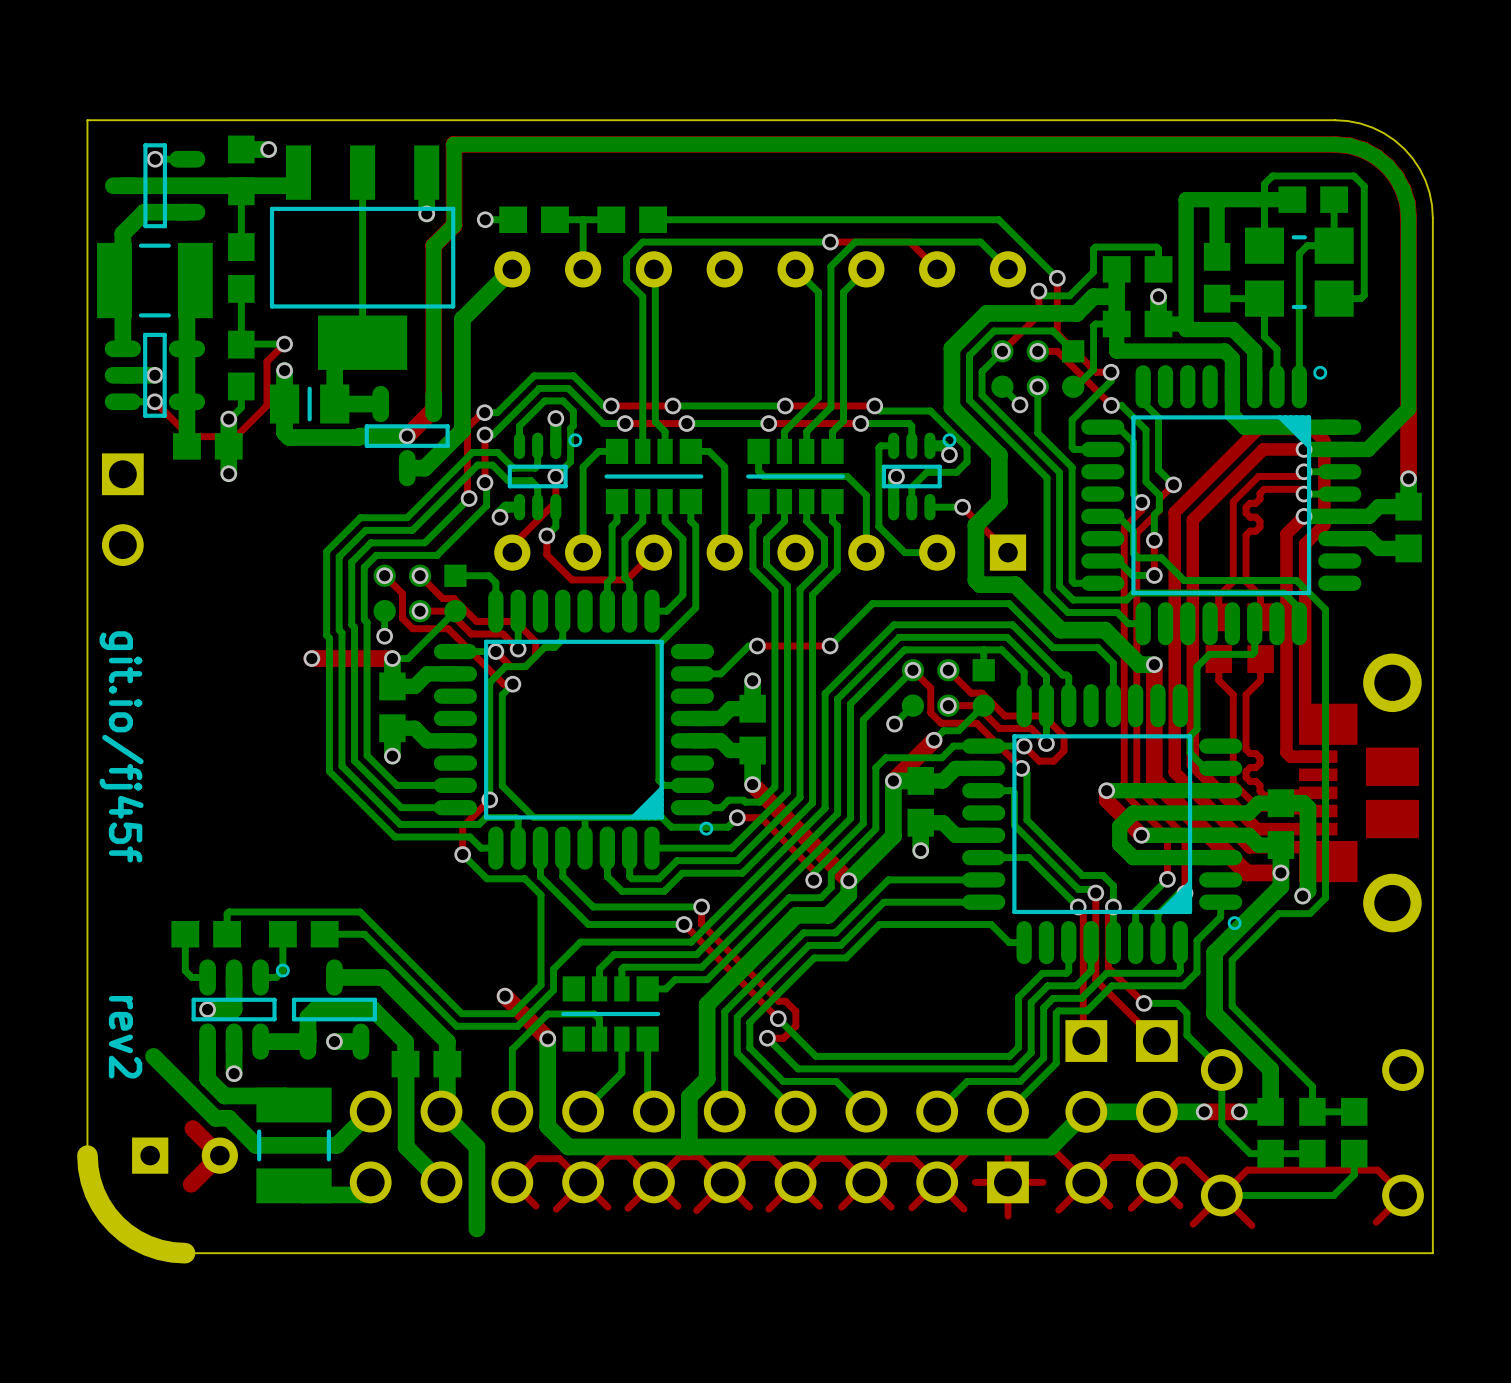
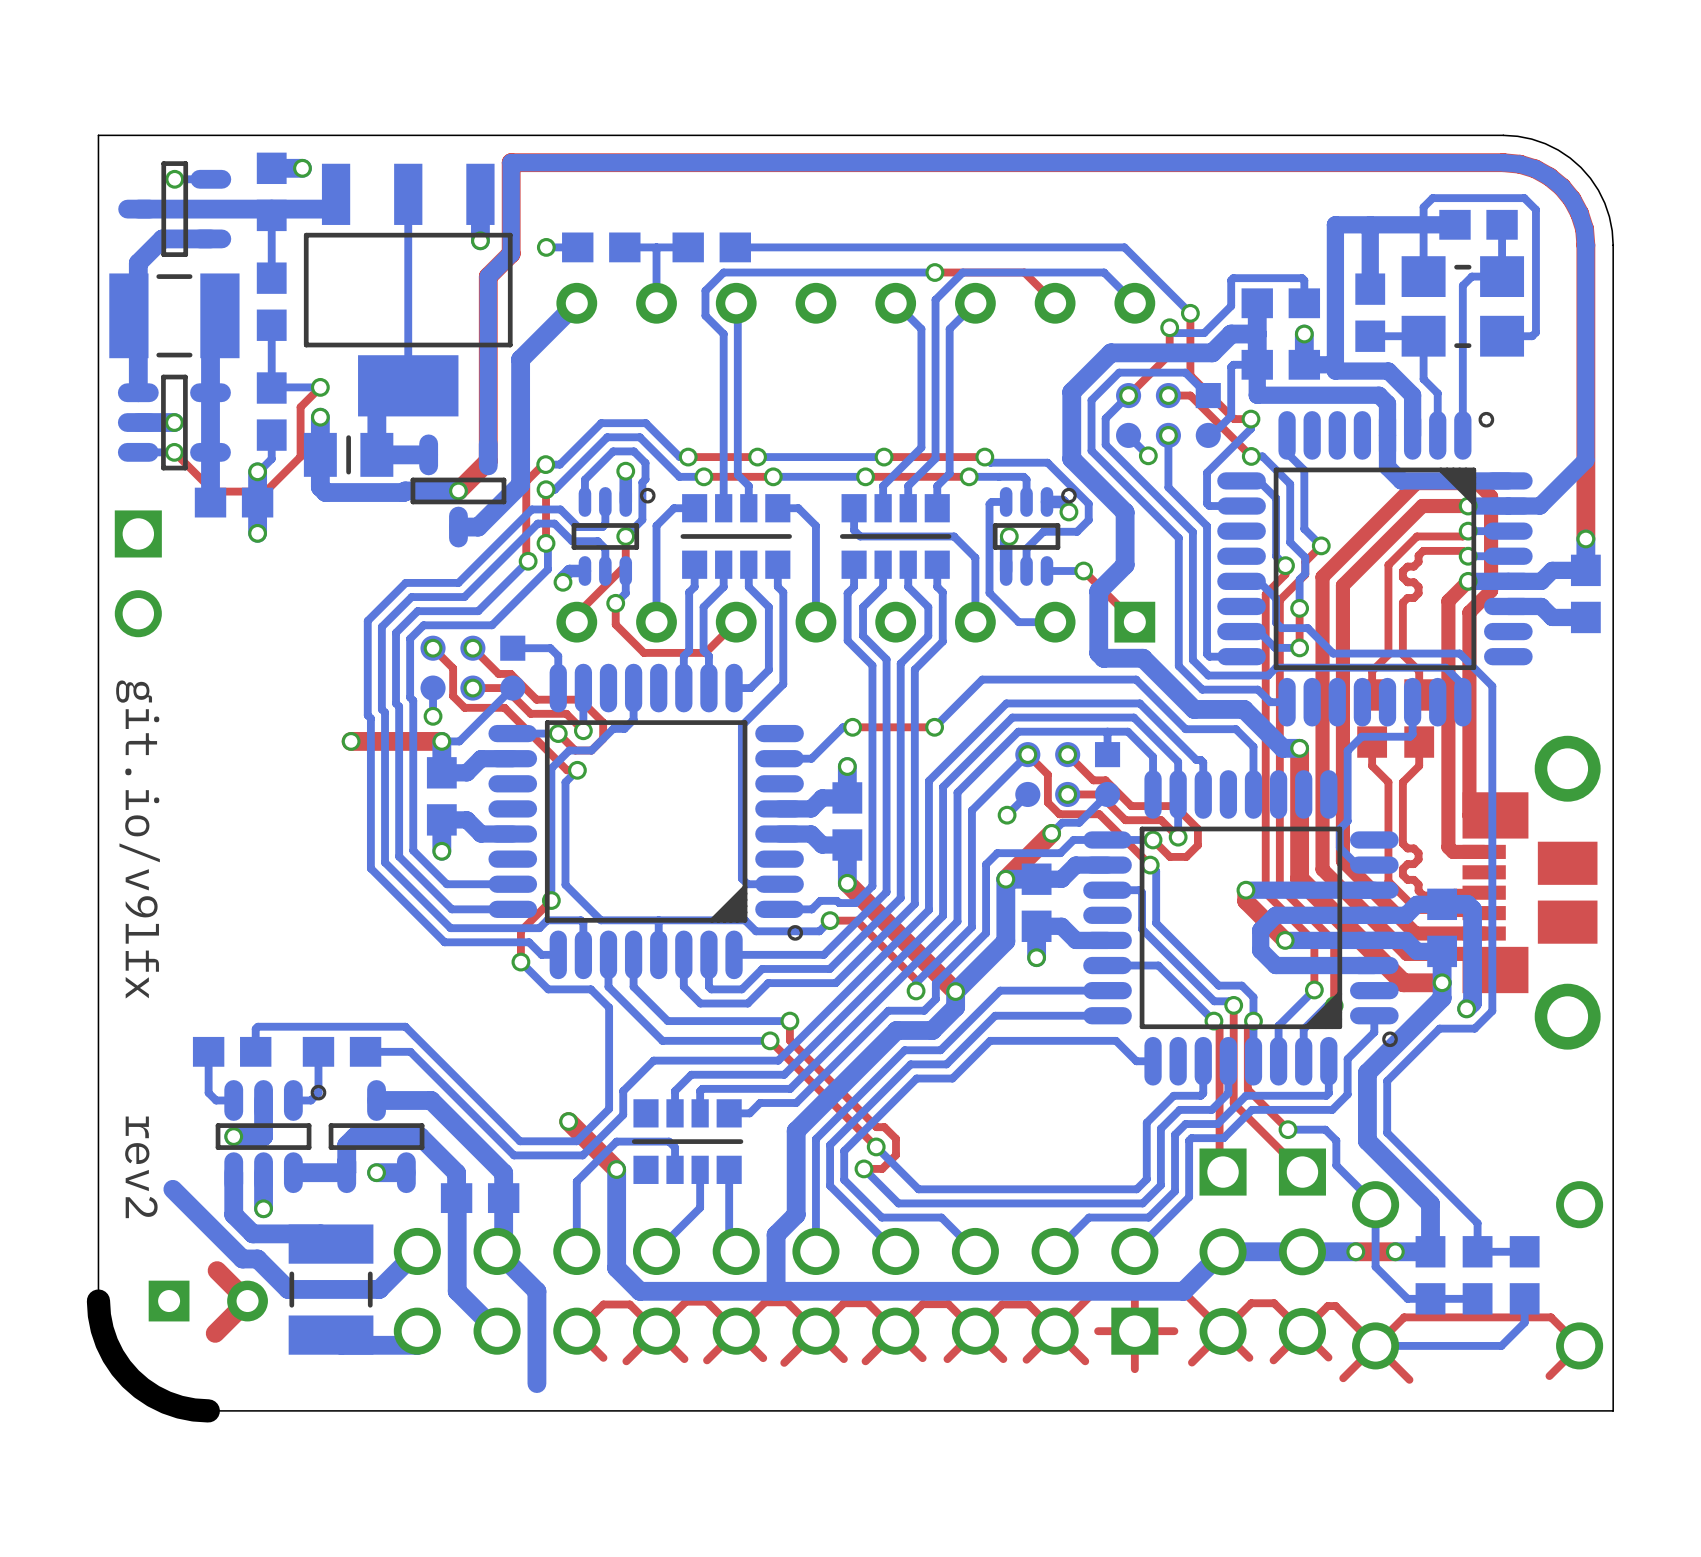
text: git.io/fj45f (121, 746) -> git.io/v9lfx (138, 839)

